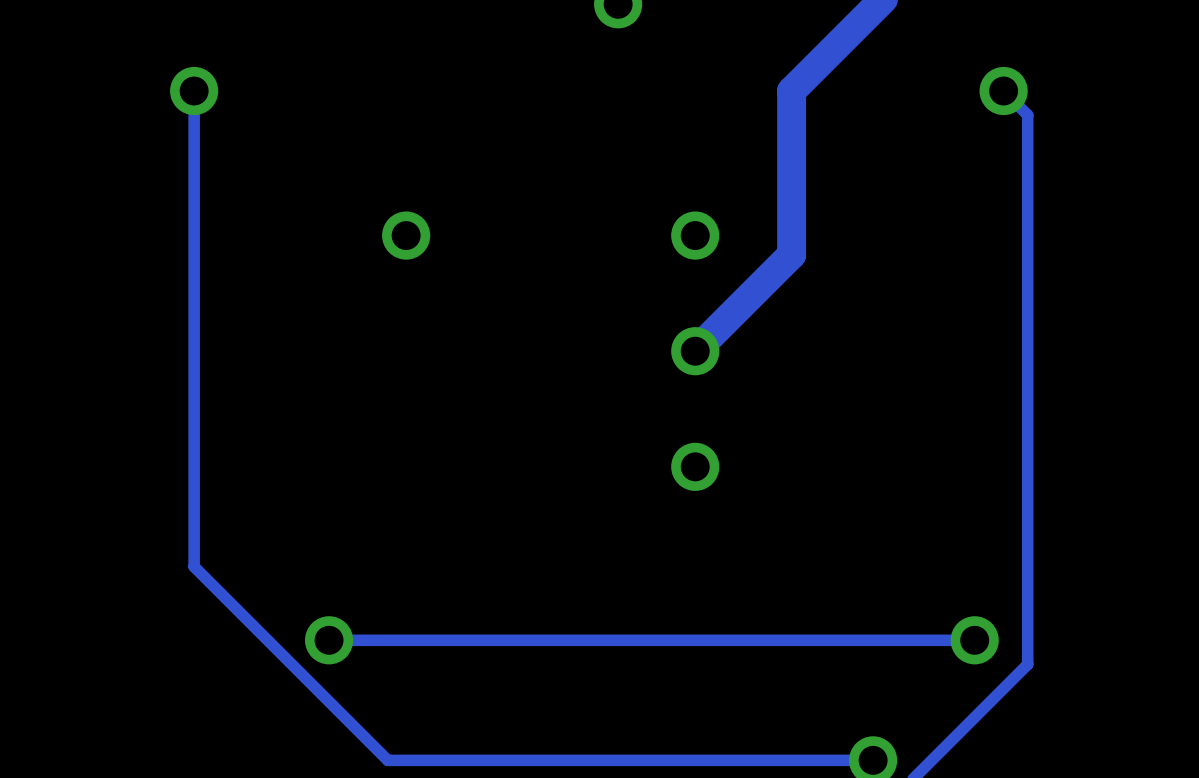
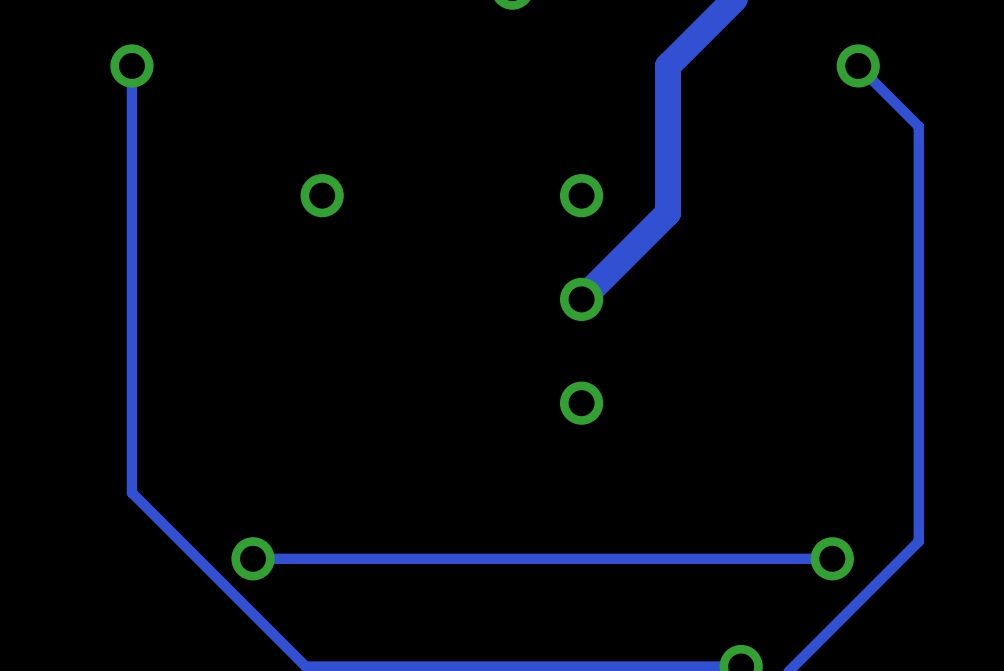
track: (1027, 115) (1027, 664) -> (879, 87) (918, 126) (918, 541) (879, 580)

